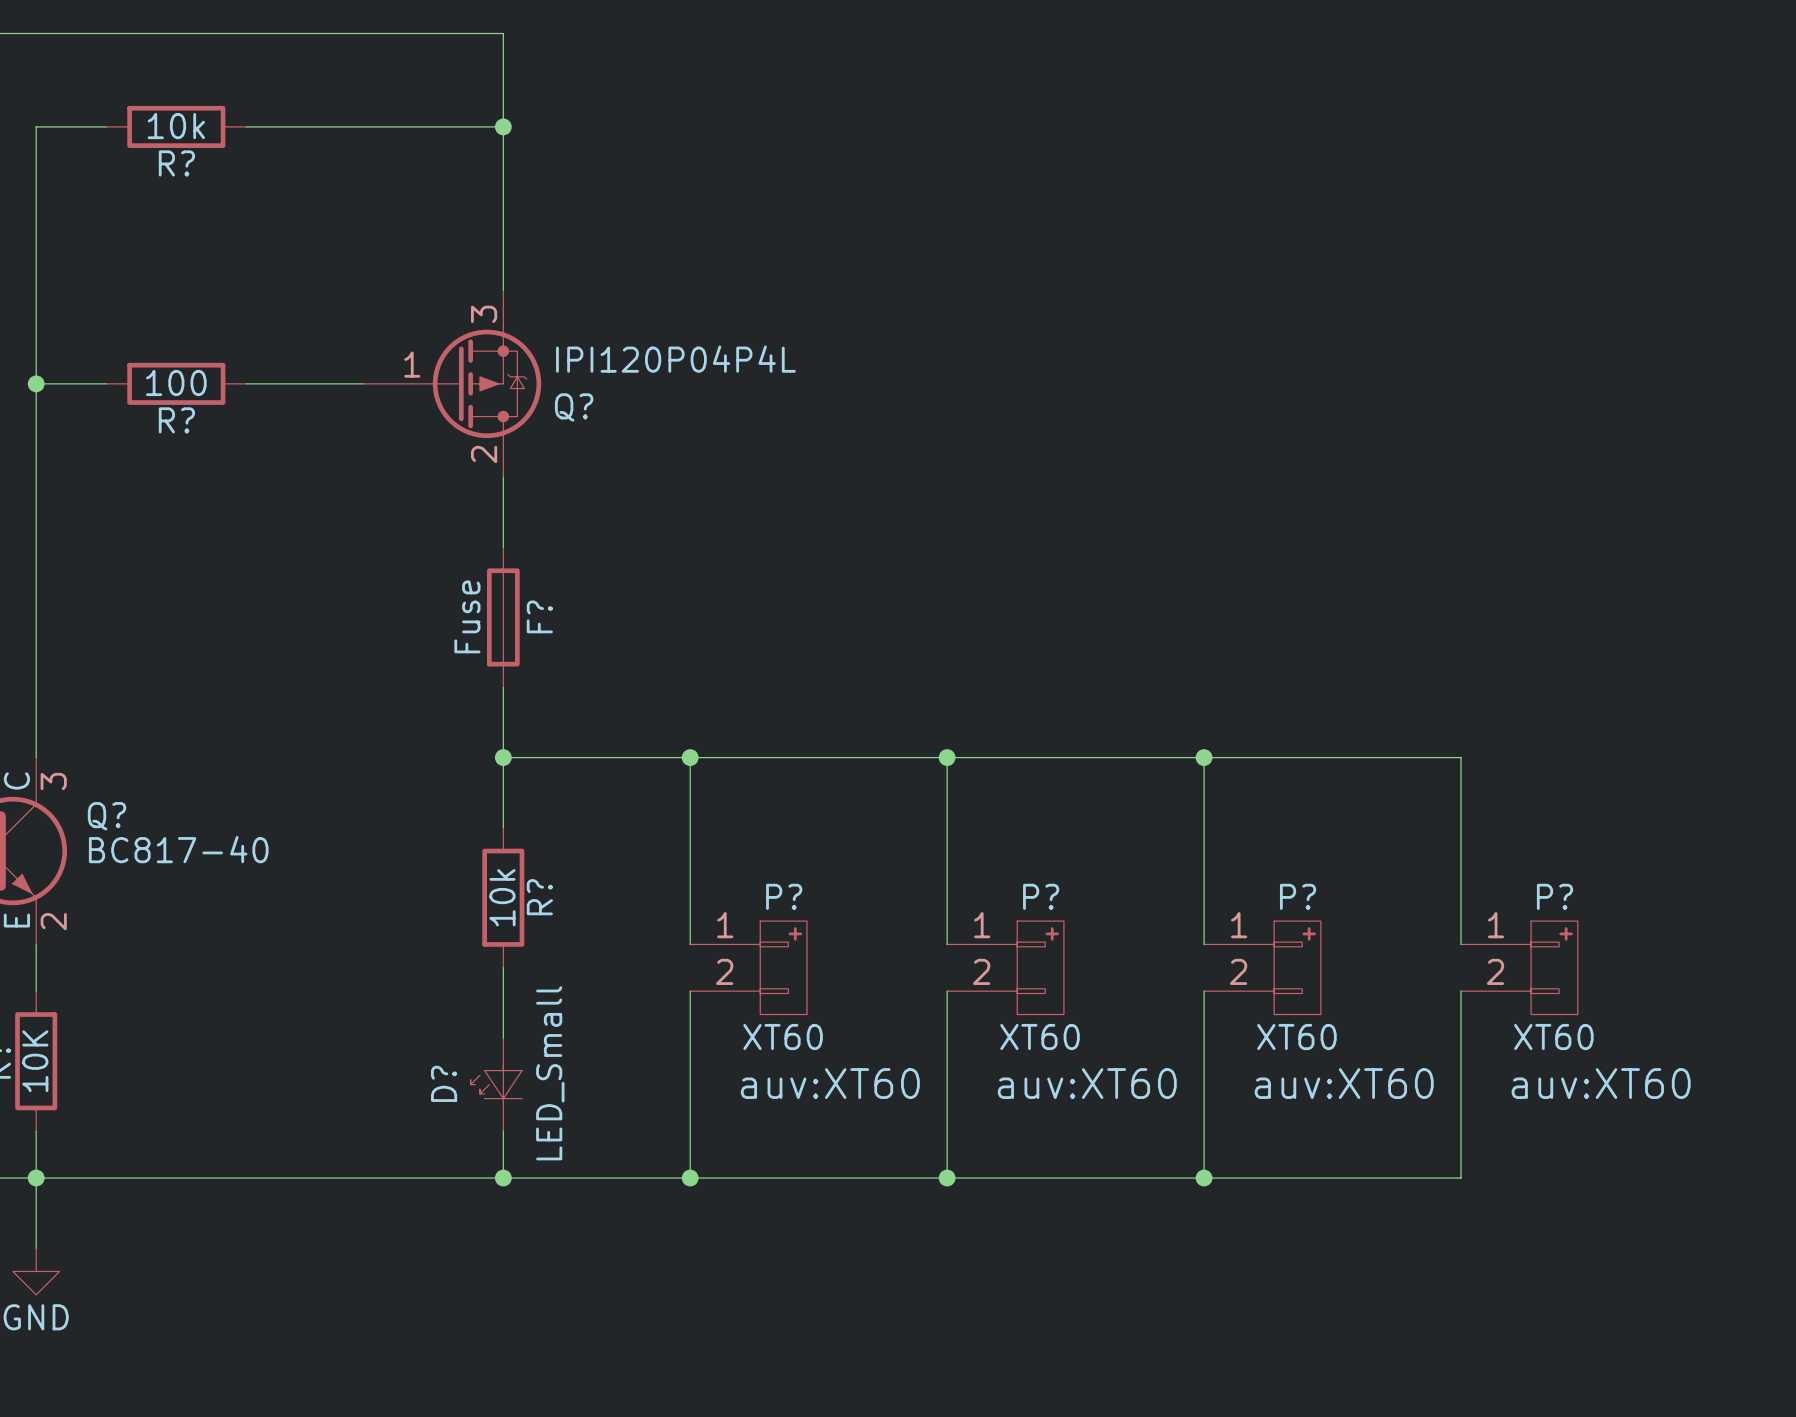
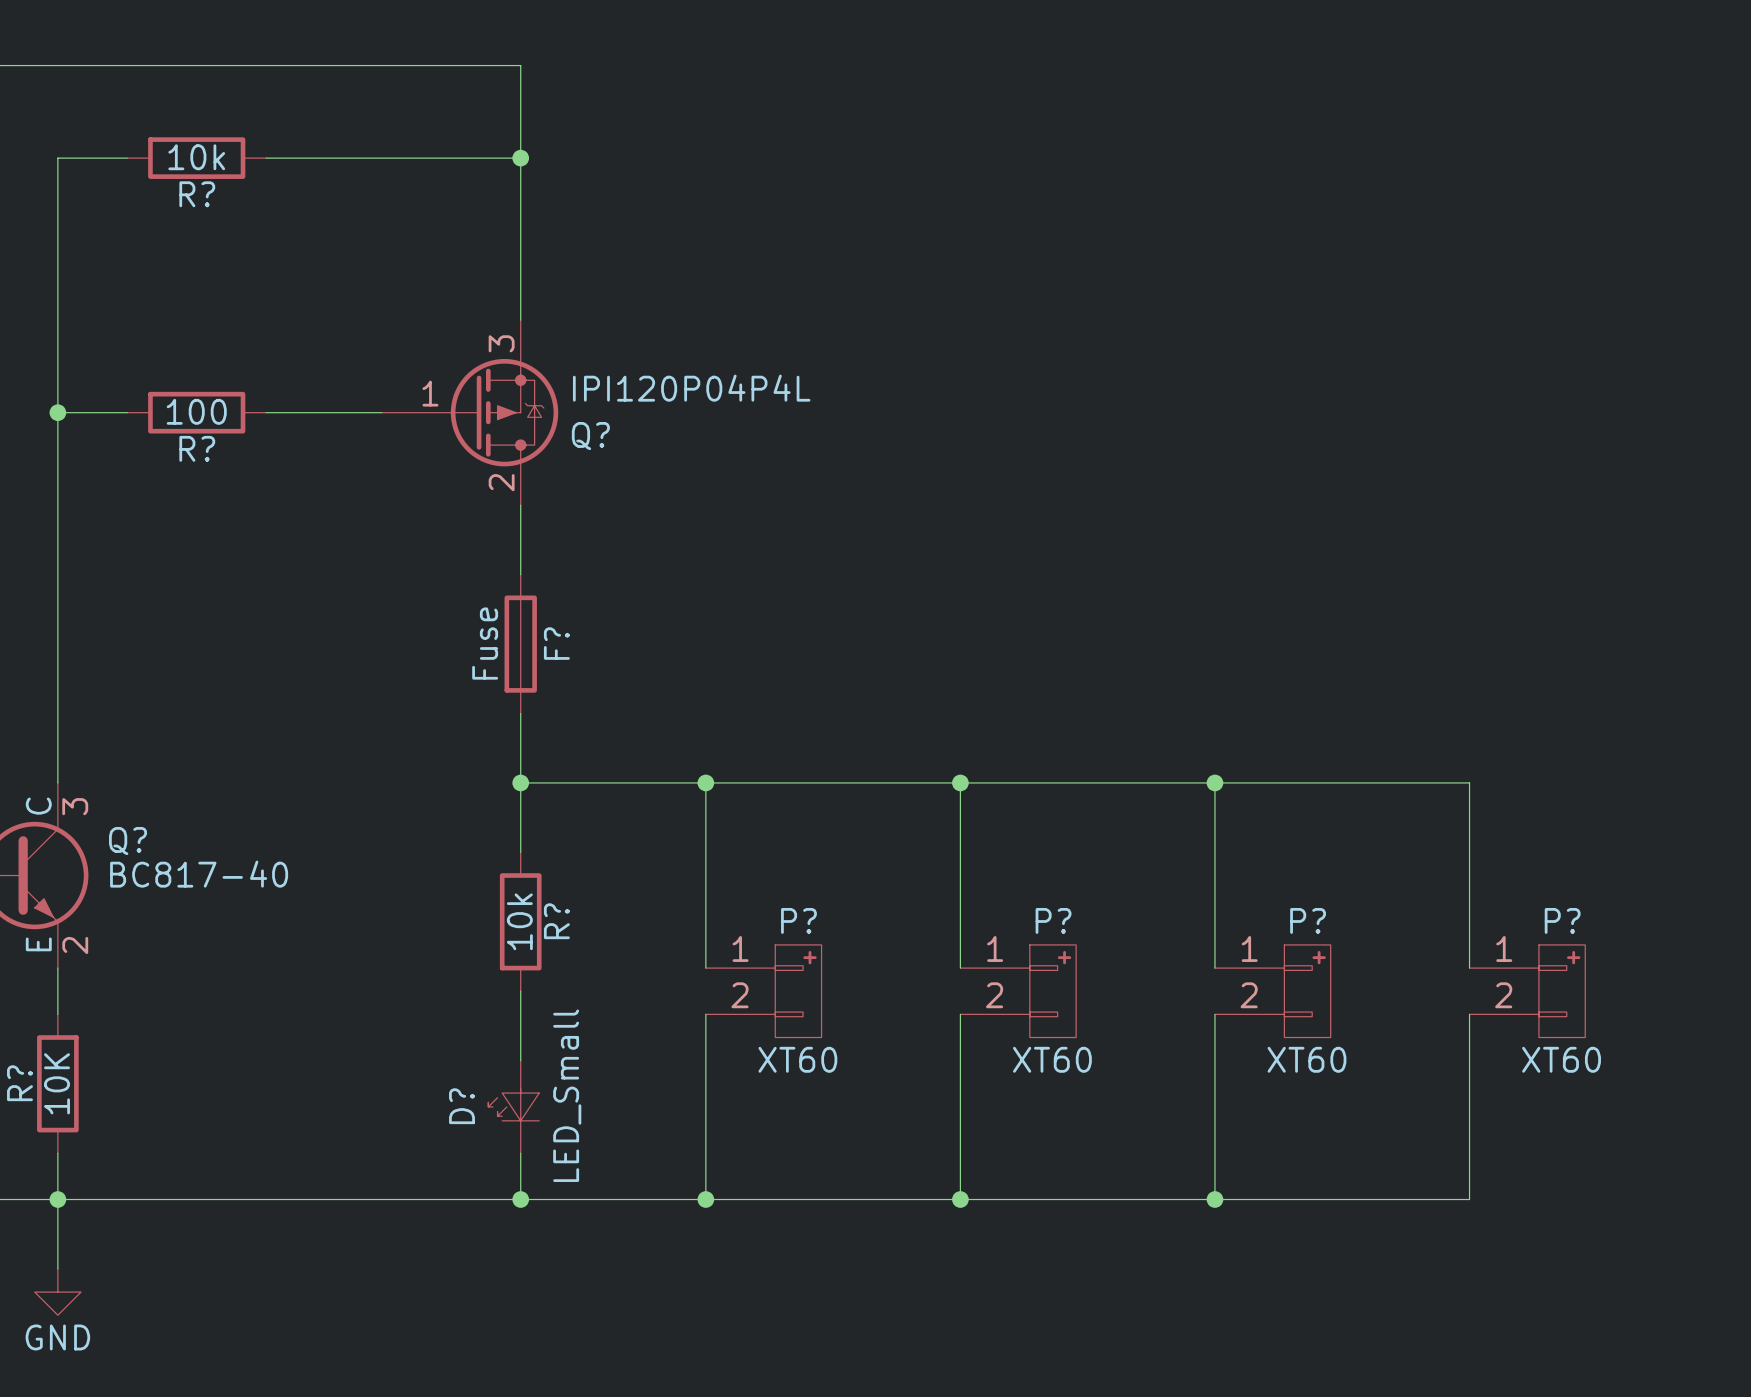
P? text: auv:XT60 (830, 1083) -> none
P? text: auv:XT60 (1087, 1083) -> none
P? text: auv:XT60 (1344, 1083) -> none
P? text: auv:XT60 (1601, 1083) -> none

